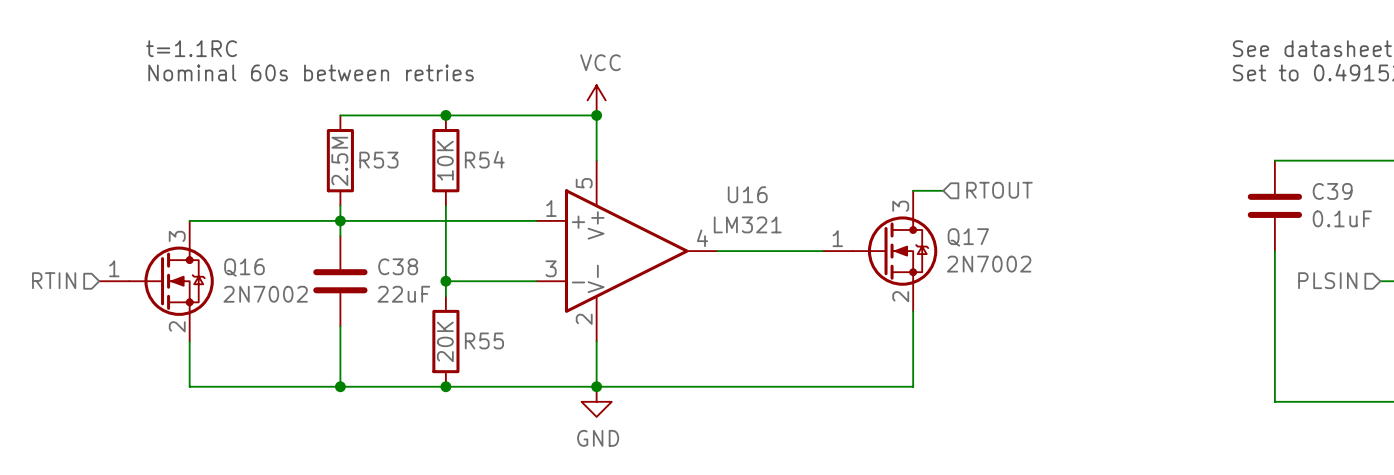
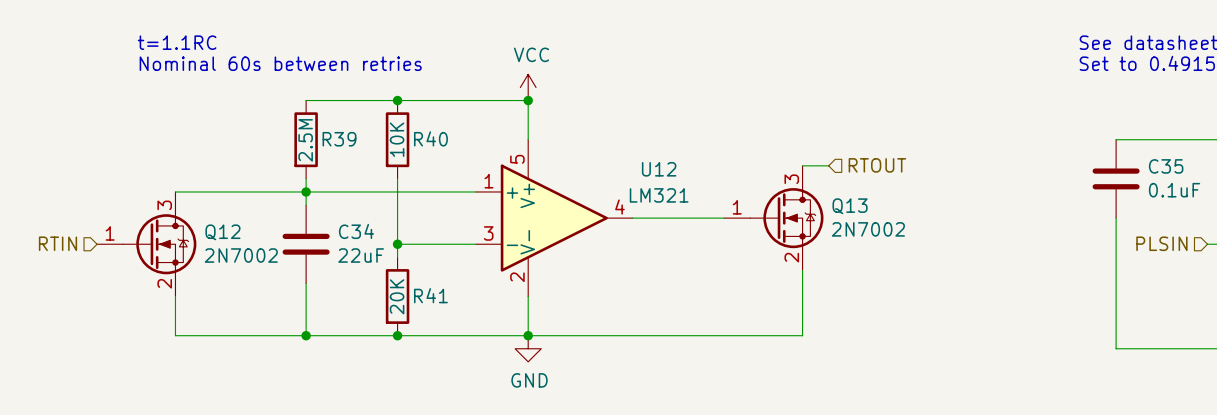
R54 name: R54 (484, 159) -> R40 (430, 138)
R53 name: R53 (378, 160) -> R39 (339, 139)
C39 name: C39 (1332, 191) -> C35 (1166, 166)
U16 name: U16 (747, 194) -> U12 (659, 169)
Q17 name: Q17 (968, 237) -> Q13 (850, 206)
C38 name: C38 (398, 266) -> C34 (356, 231)
Q16 name: Q16 (244, 267) -> Q12 (222, 232)
R55 name: R55 (484, 340) -> R41 (430, 295)

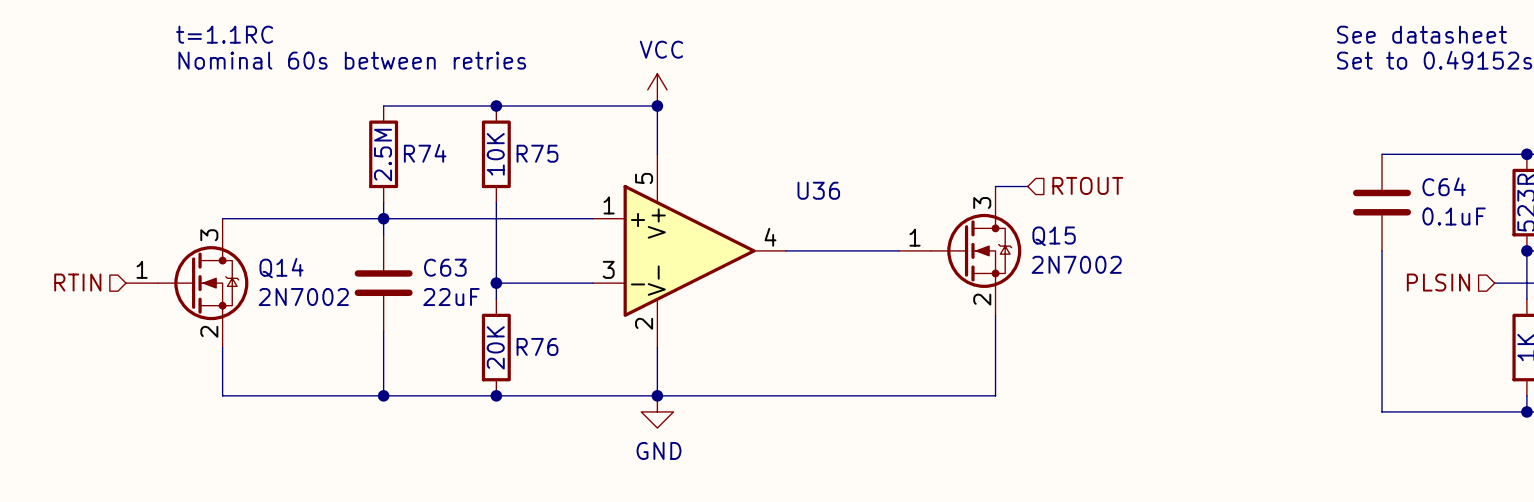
R40 name: R40 (430, 138) -> R75 (537, 153)
R39 name: R39 (339, 139) -> R74 (425, 153)
C35 name: C35 (1166, 166) -> C64 (1444, 186)
U12 name: U12 (659, 169) -> U36 (818, 190)
U12 value: LM321 (659, 195) -> none
Q13 name: Q13 (850, 206) -> Q15 (1054, 236)
C34 name: C34 (356, 231) -> C63 (445, 267)
Q12 name: Q12 (222, 232) -> Q14 (281, 268)
R41 name: R41 (430, 295) -> R76 (537, 346)

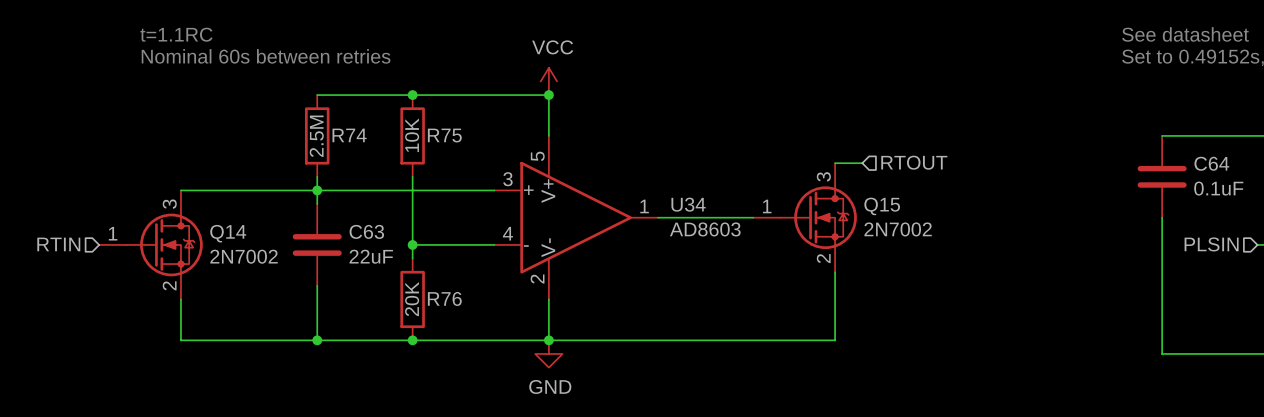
U36 name: U36 (818, 190) -> U34 (688, 204)
U36 pin number: 1 (609, 205) -> 3 (507, 179)
U36 pin number: 4 (770, 237) -> 1 (644, 206)
U36 value: none -> AD8603 (705, 229)
U36 pin number: 3 (608, 269) -> 4 (507, 233)

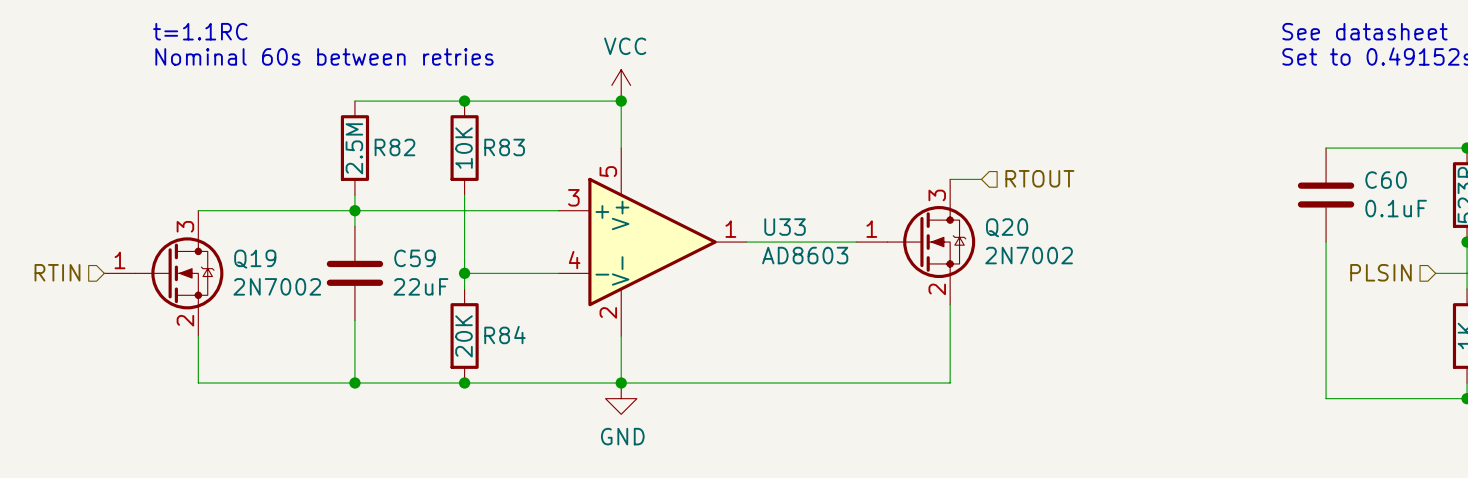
R74 name: R74 (349, 135) -> R82 (394, 147)
R75 name: R75 (444, 135) -> R83 (504, 147)
C64 name: C64 (1211, 163) -> C60 (1386, 180)
U34 name: U34 (688, 204) -> U33 (785, 227)
Q15 name: Q15 (882, 206) -> Q20 (1007, 227)
C63 name: C63 (366, 231) -> C59 (414, 258)
Q14 name: Q14 (228, 233) -> Q19 (255, 259)
R76 name: R76 (444, 298) -> R84 (504, 335)

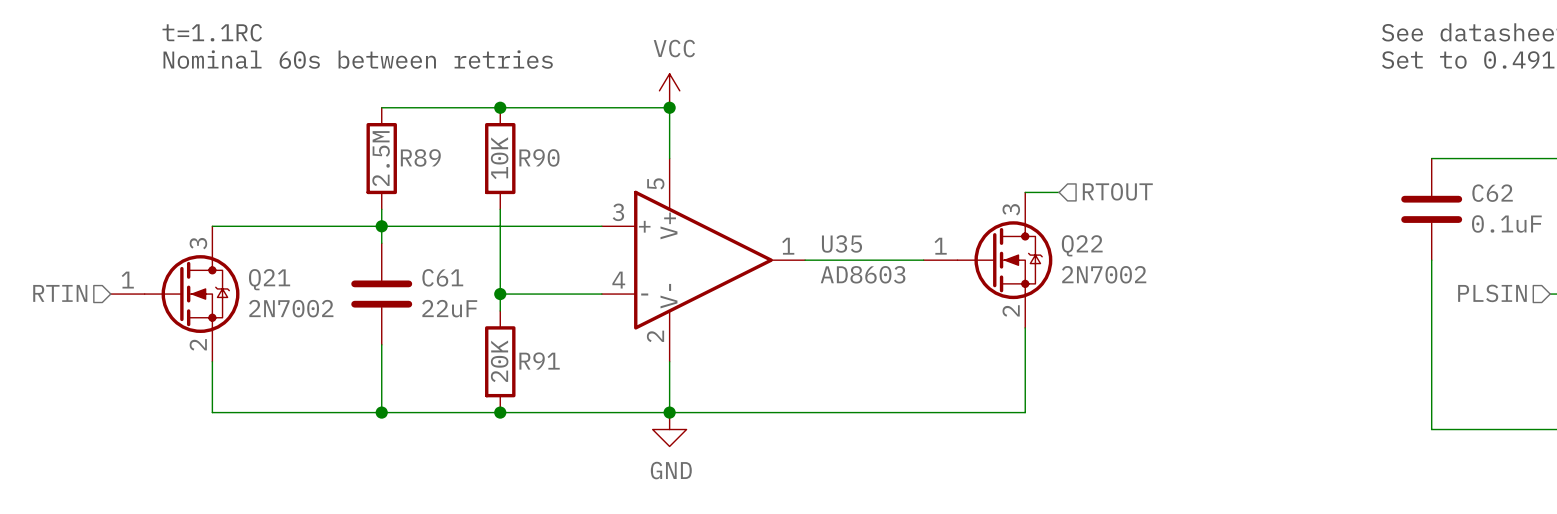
R82 name: R82 (394, 147) -> R89 (420, 157)
R83 name: R83 (504, 147) -> R90 (539, 157)
C60 name: C60 (1386, 180) -> C62 (1492, 193)
U33 name: U33 (785, 227) -> U35 (841, 243)
Q20 name: Q20 (1007, 227) -> Q22 (1082, 245)
C59 name: C59 (414, 258) -> C61 (442, 277)
Q19 name: Q19 (255, 259) -> Q21 (269, 279)
R84 name: R84 (504, 335) -> R91 (539, 361)

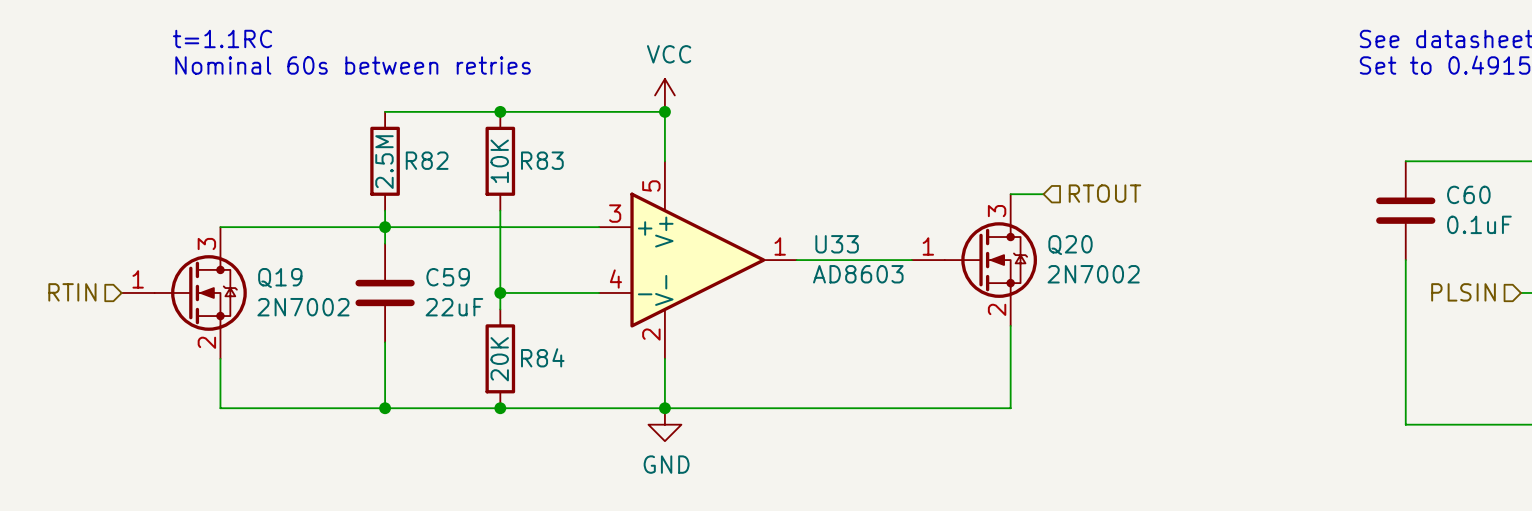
R89 name: R89 (420, 157) -> R82 (427, 160)
R90 name: R90 (539, 157) -> R83 (542, 160)
C62 name: C62 (1492, 193) -> C60 (1468, 194)
U35 name: U35 (841, 243) -> U33 (837, 244)
Q22 name: Q22 (1082, 245) -> Q20 (1070, 245)
C61 name: C61 (442, 277) -> C59 (448, 277)
Q21 name: Q21 (269, 279) -> Q19 (280, 278)
R91 name: R91 (539, 361) -> R84 (542, 357)

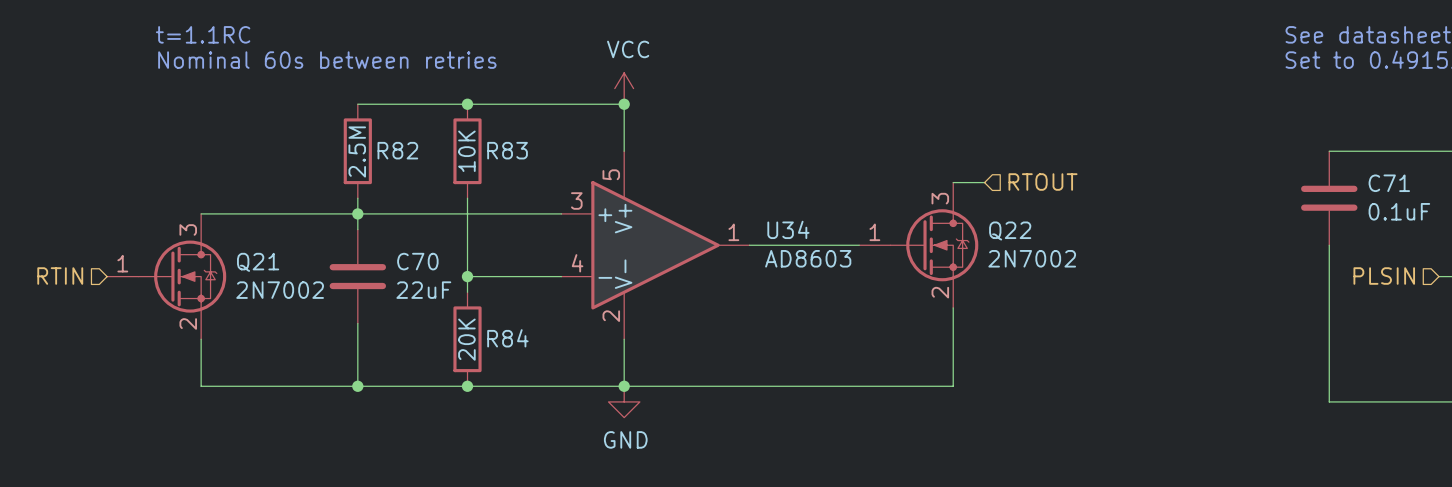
C60 name: C60 (1468, 194) -> C71 (1389, 183)
U33 name: U33 (837, 244) -> U34 (788, 229)
Q20 name: Q20 (1070, 245) -> Q22 (1010, 231)
C59 name: C59 (448, 277) -> C70 (417, 261)
Q19 name: Q19 (280, 278) -> Q21 (258, 262)

